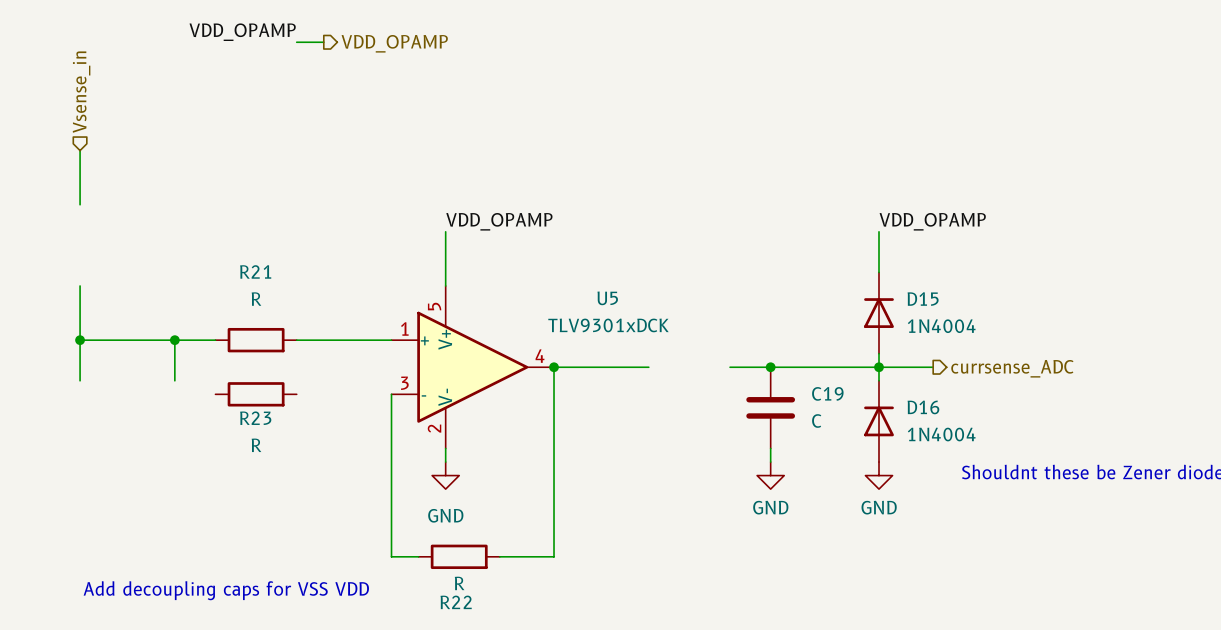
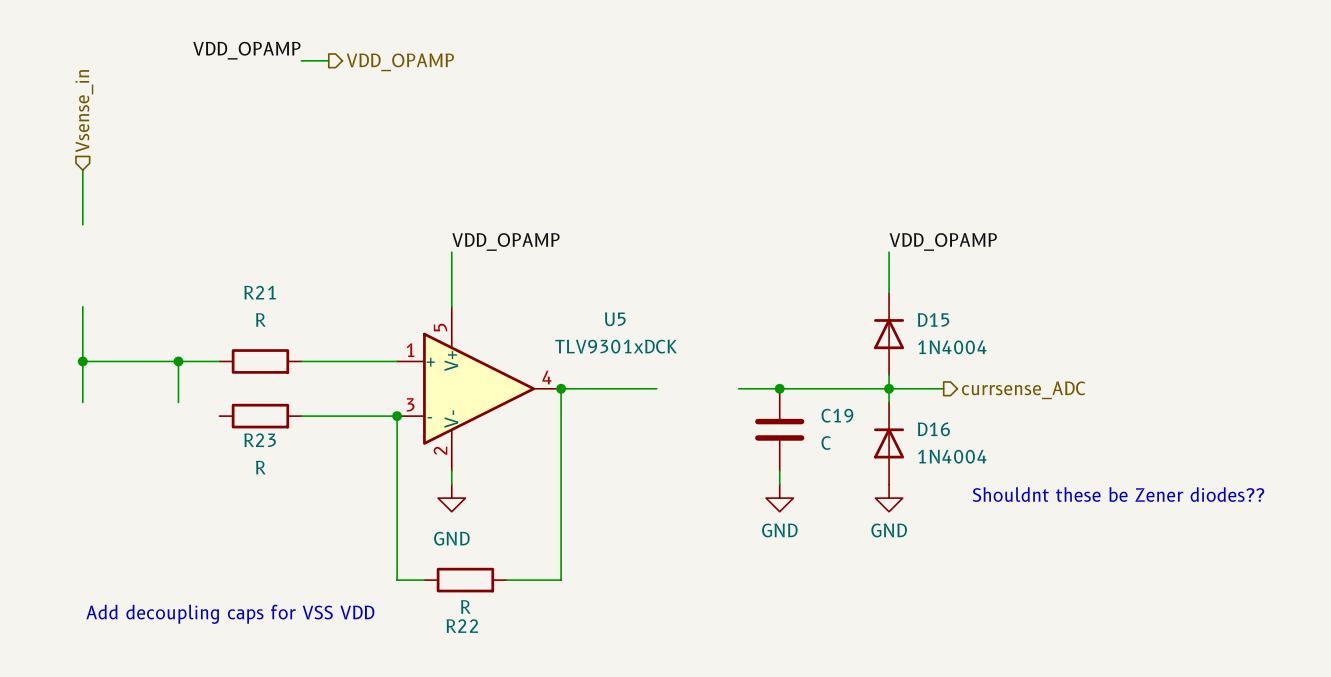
wire: none -> (301, 416) (397, 416)
junction: none -> (397, 416)

